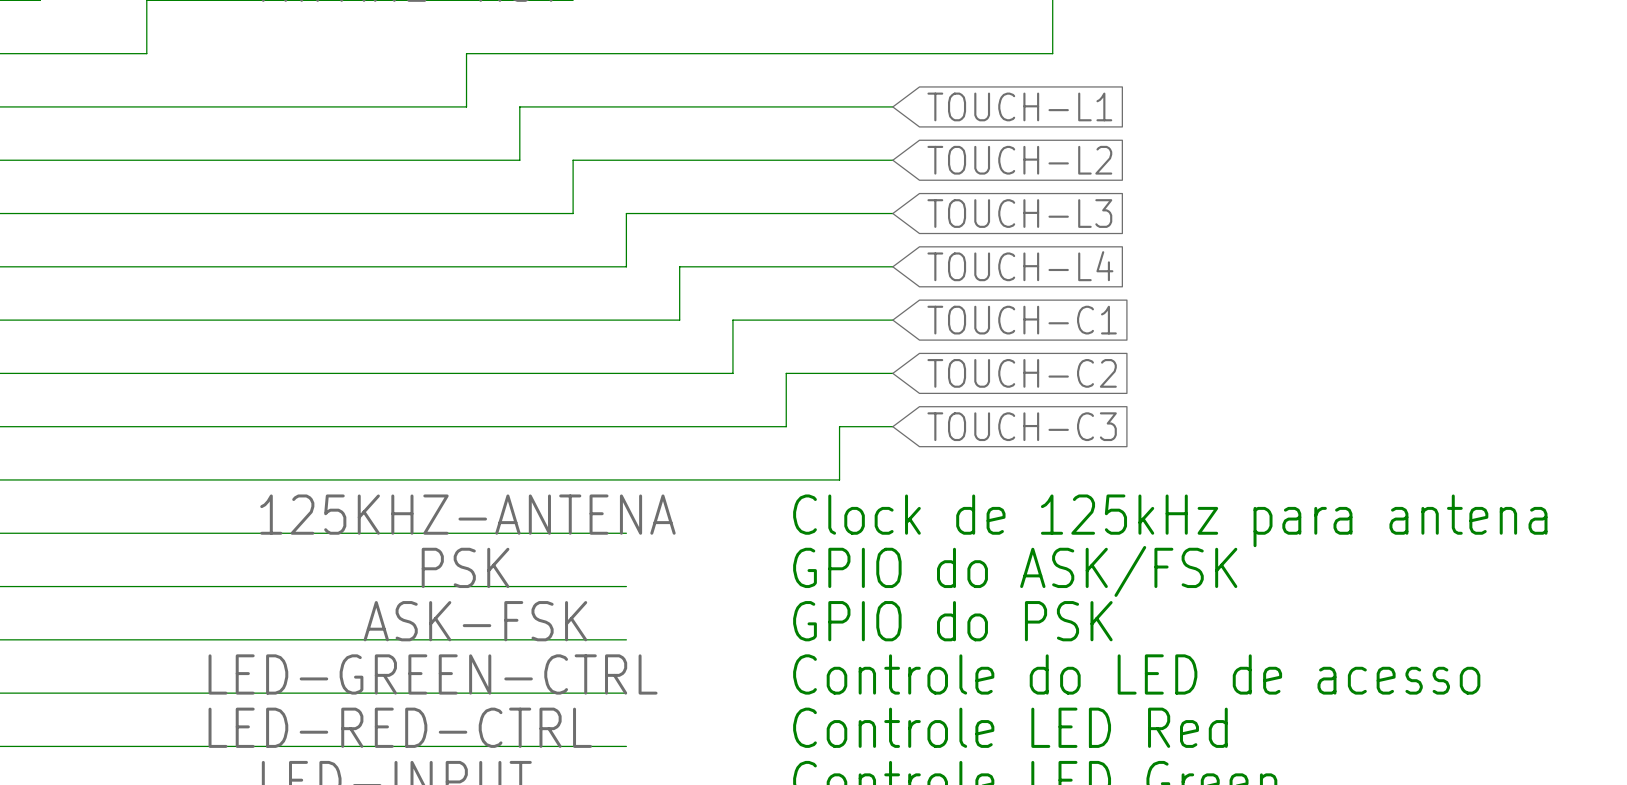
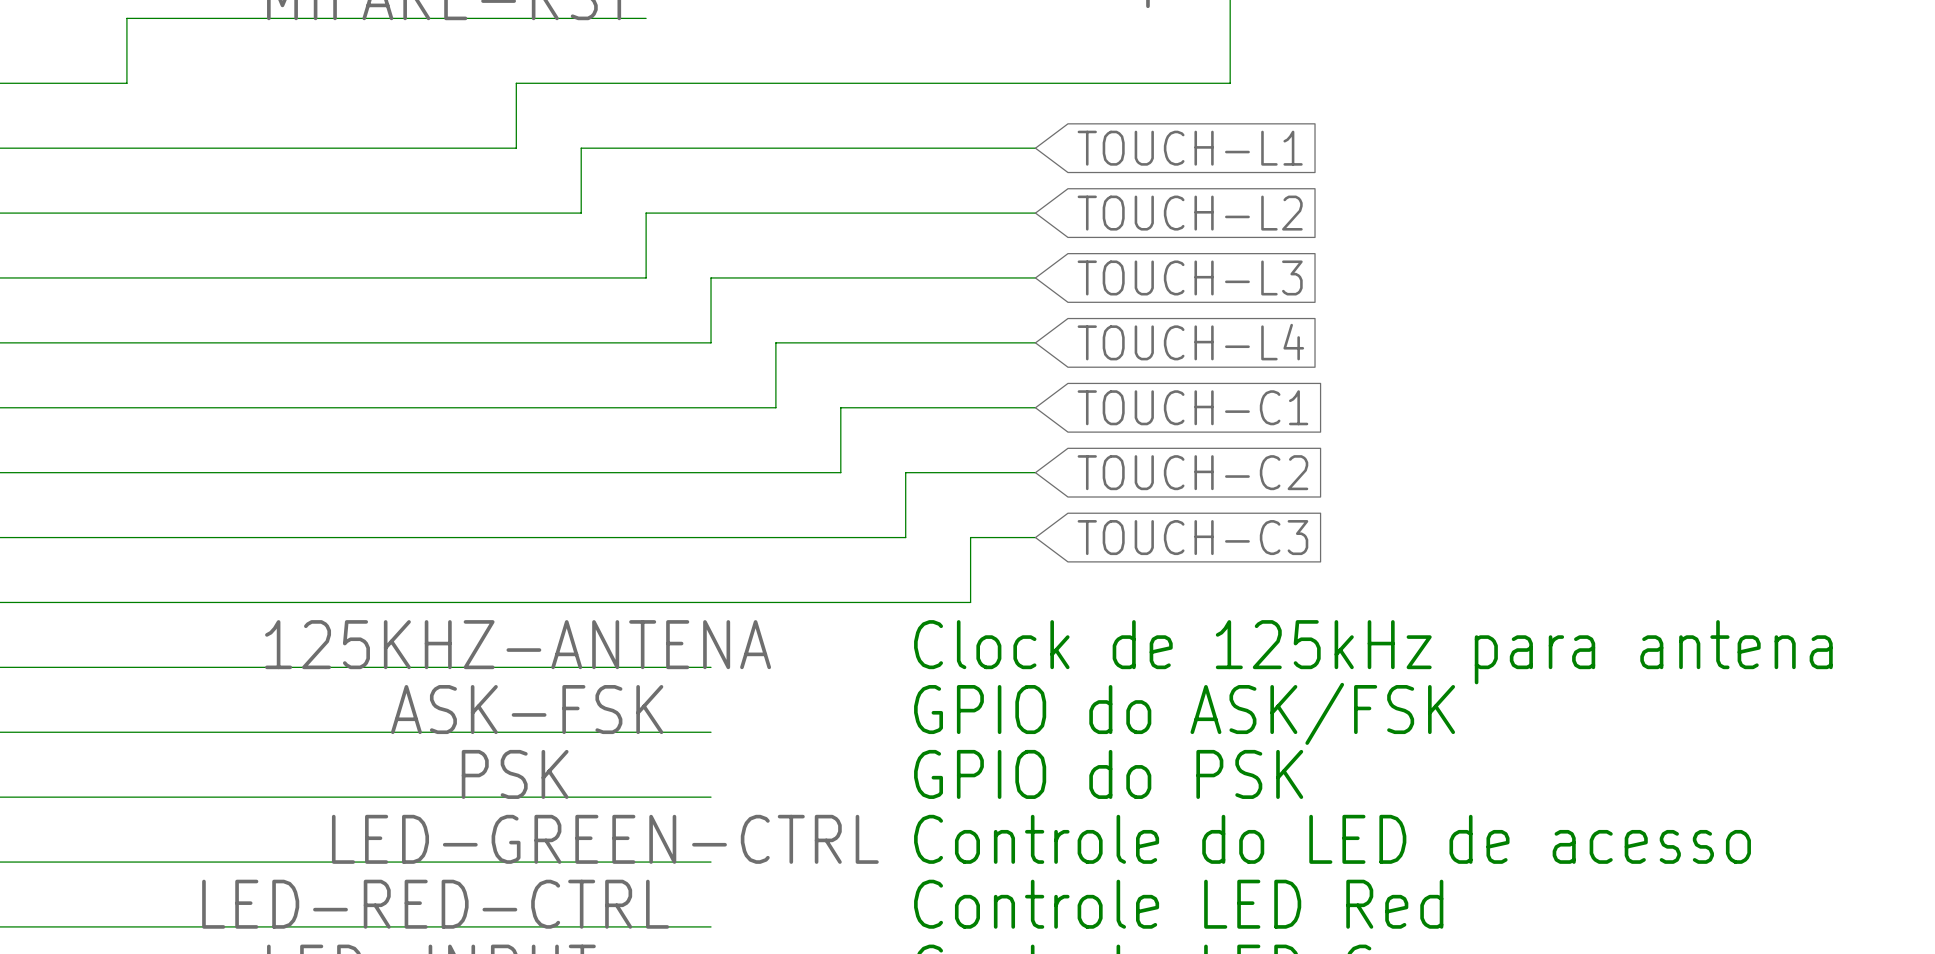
label position: PSK (465, 567) -> PSK (515, 774)
label position: ASK-FSK (475, 621) -> ASK-FSK (527, 709)
label position: LED-GREEN-CTRL (433, 674) -> LED-GREEN-CTRL (605, 839)

